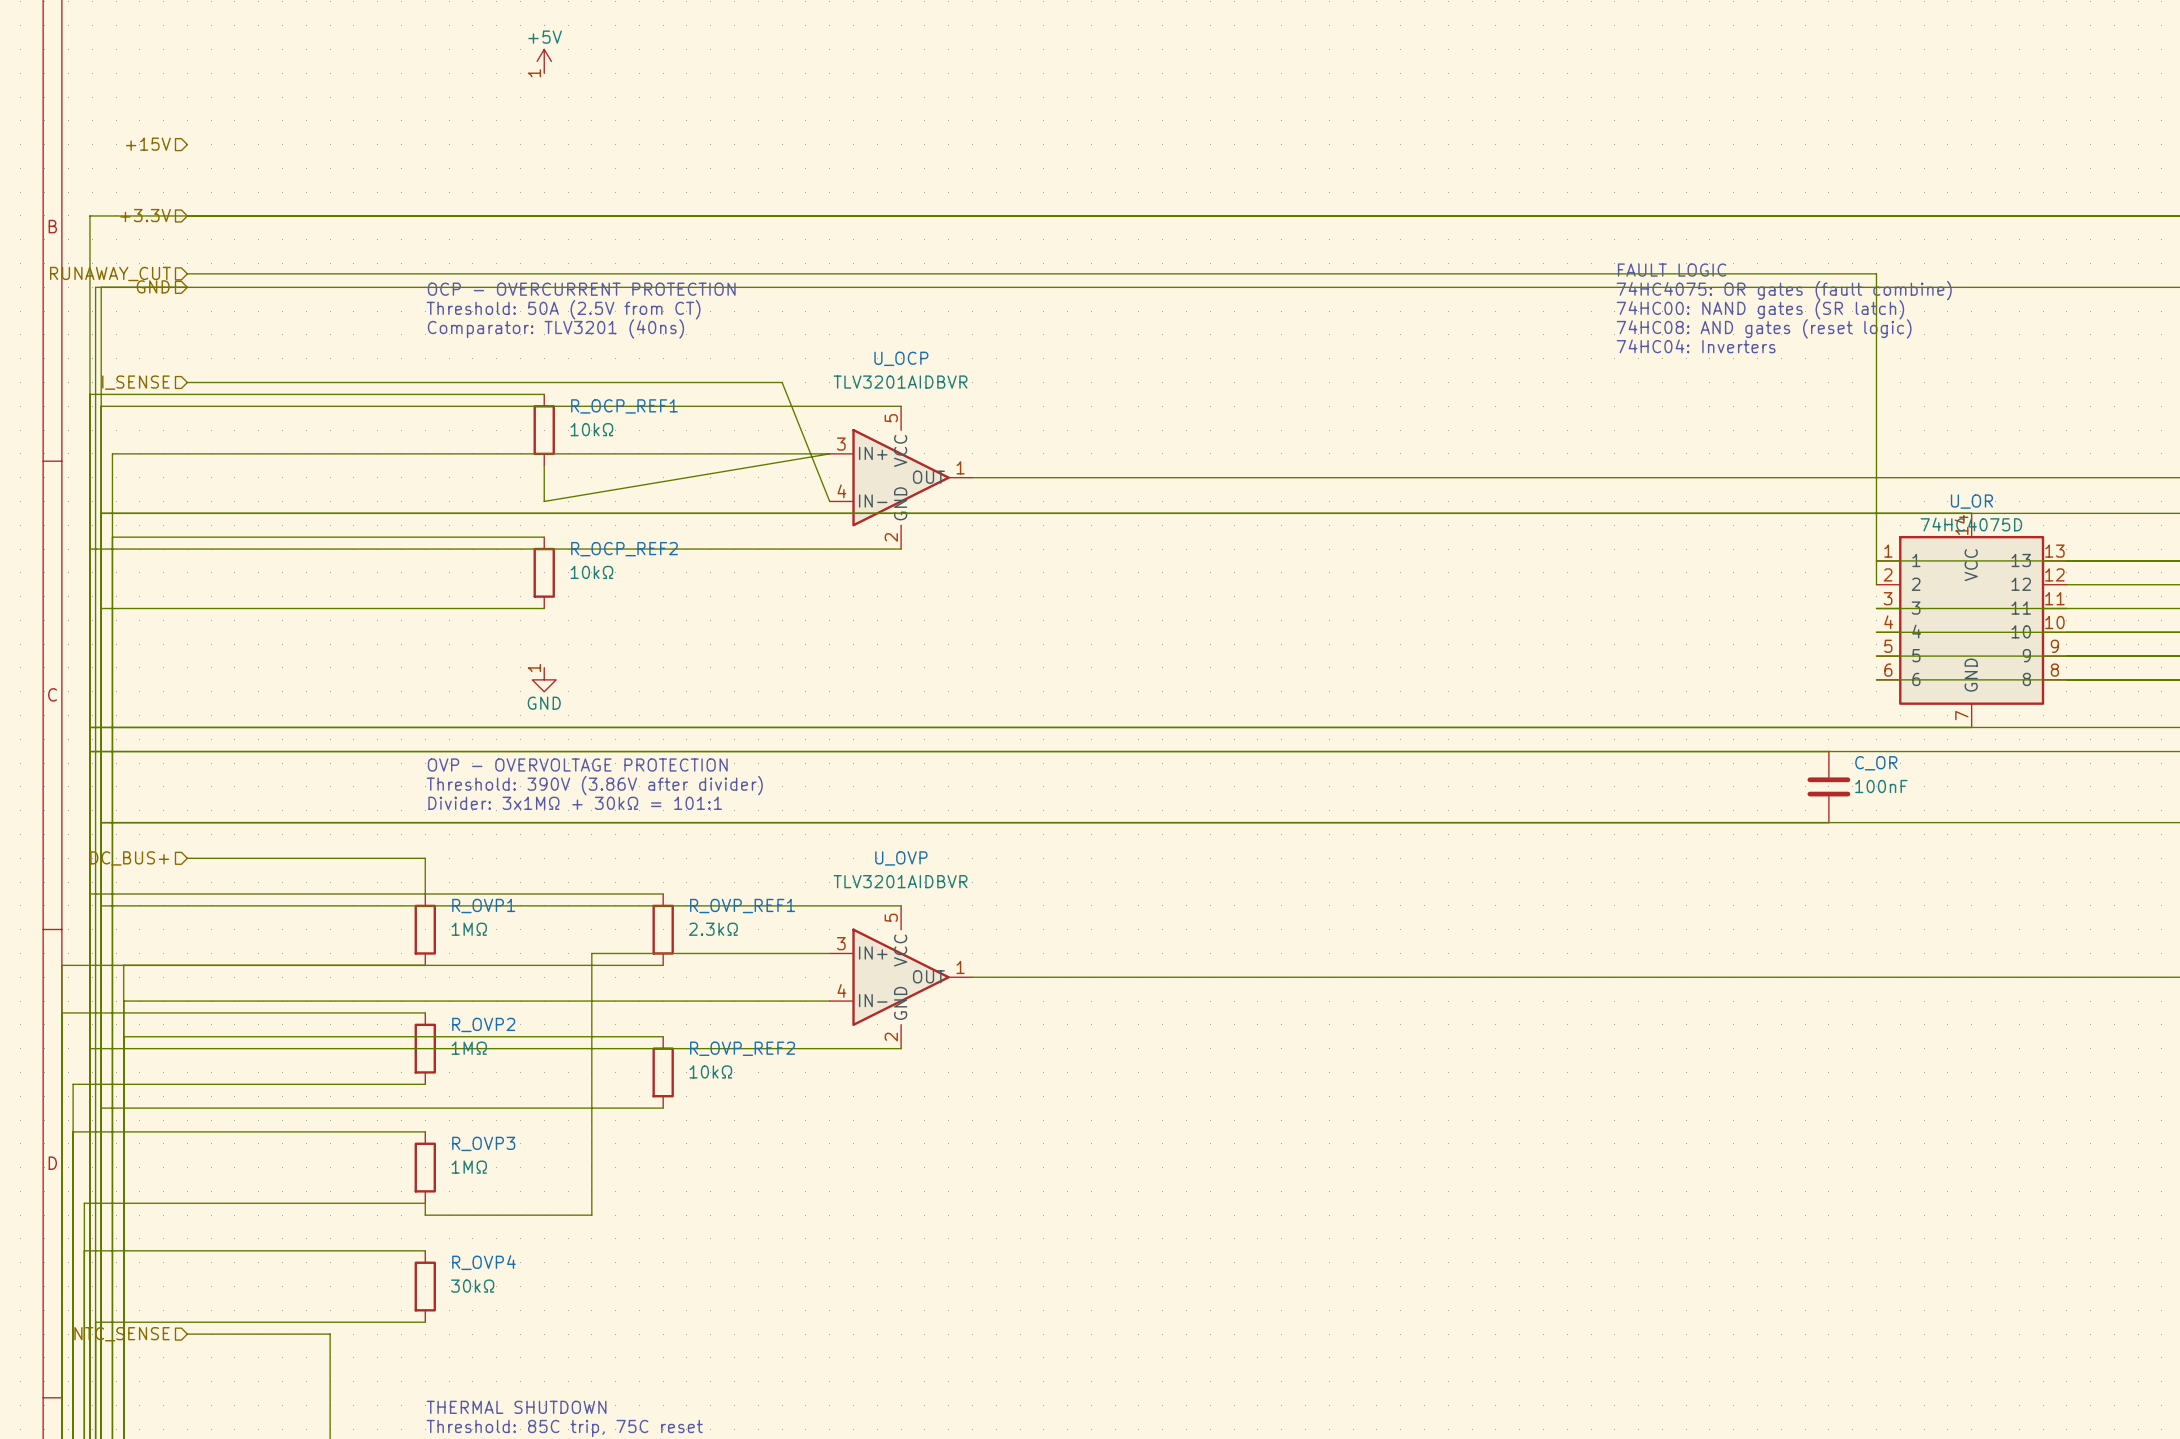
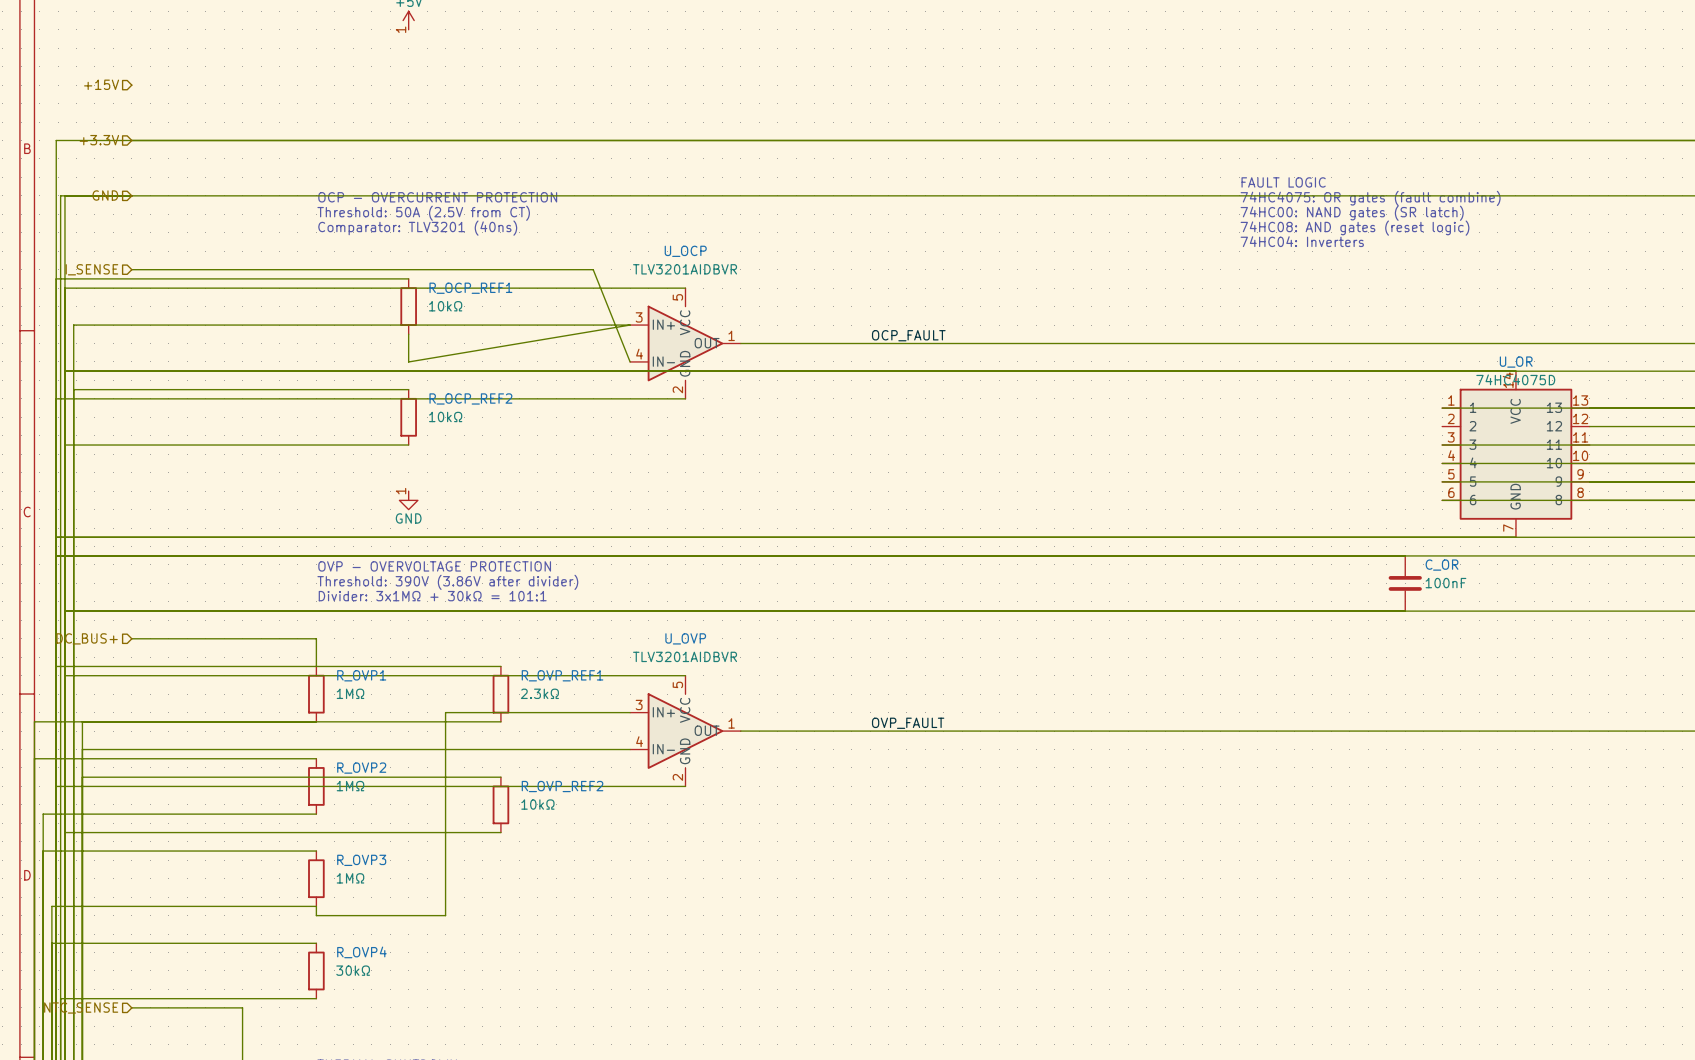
hierarchical label: RUNAWAY_CUT (110, 273) -> none
wire: (187, 273) (1876, 273) (1876, 584) -> none
label: none -> OCP_FAULT (908, 335)
label: none -> OVP_FAULT (908, 723)

